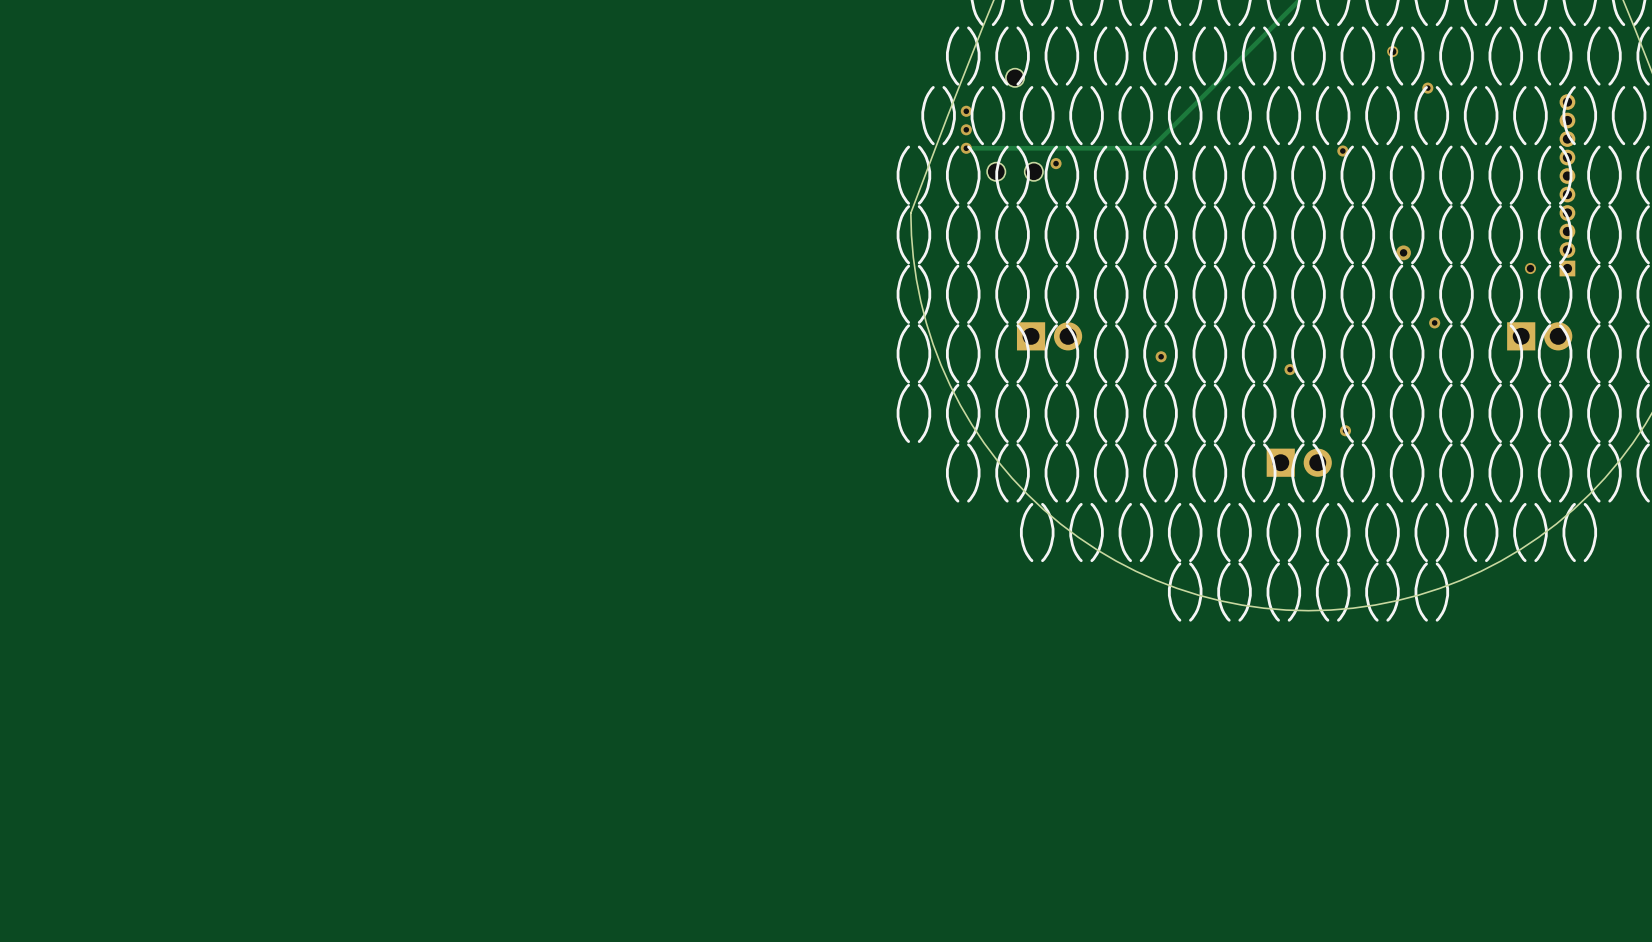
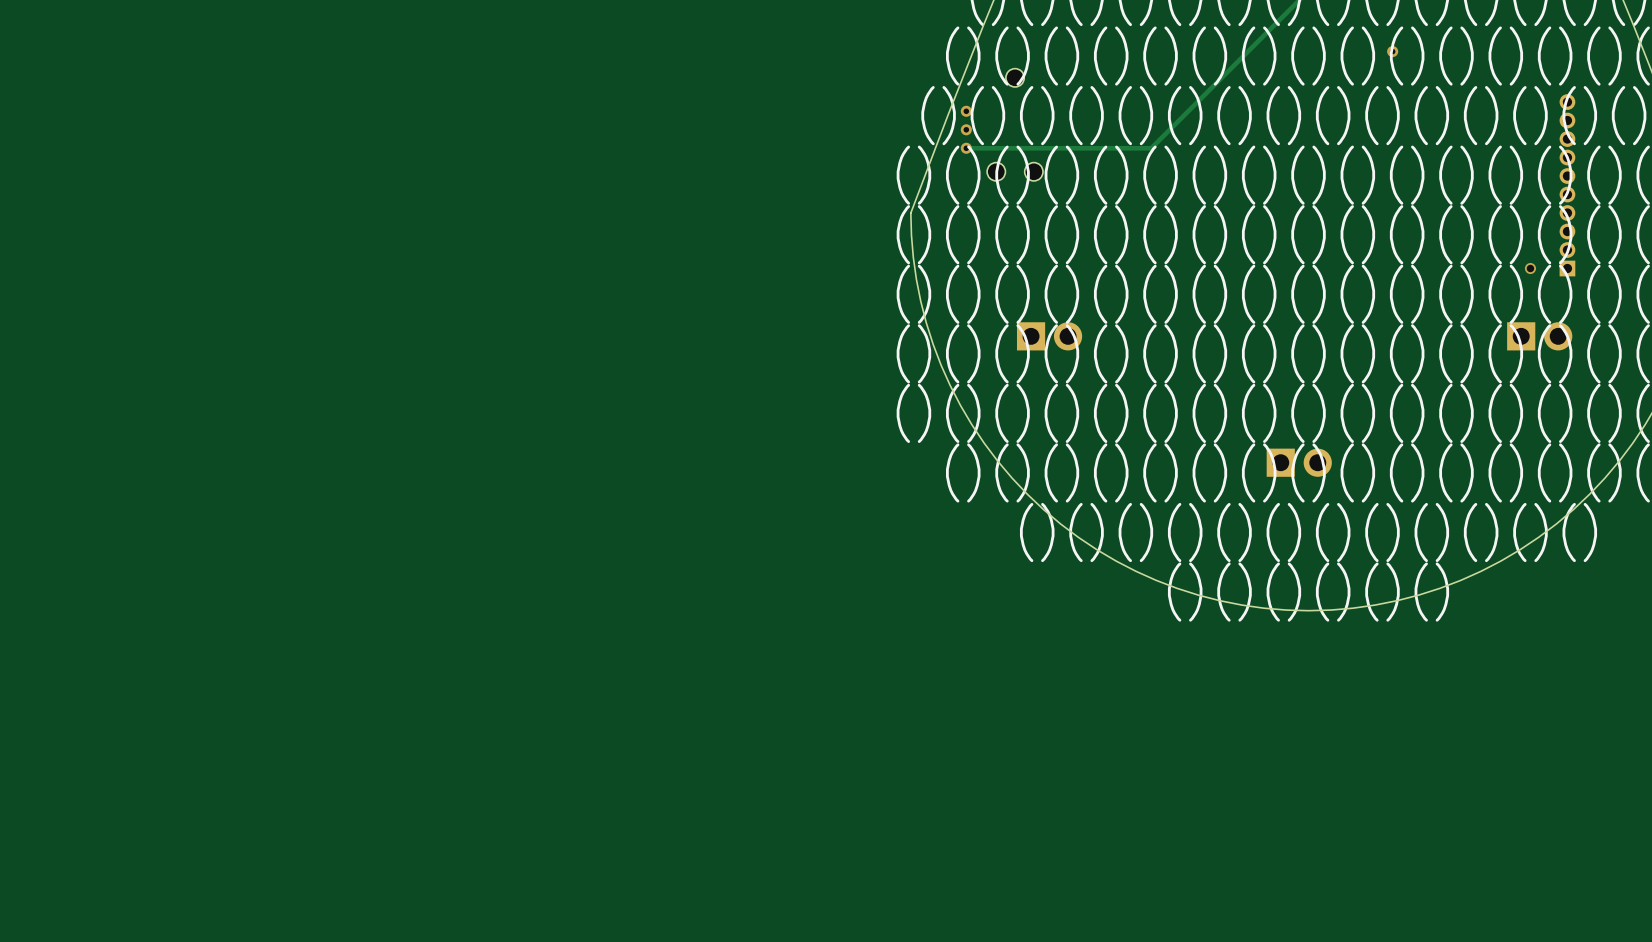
via: (1392, 51) -> none
via position: (1427, 88) -> (1392, 51)
via: (1342, 151) -> none
via: (1056, 163) -> none
via: (1403, 252) -> none
via: (1434, 322) -> none
via: (1161, 356) -> none
via: (1290, 369) -> none
via: (1345, 430) -> none

